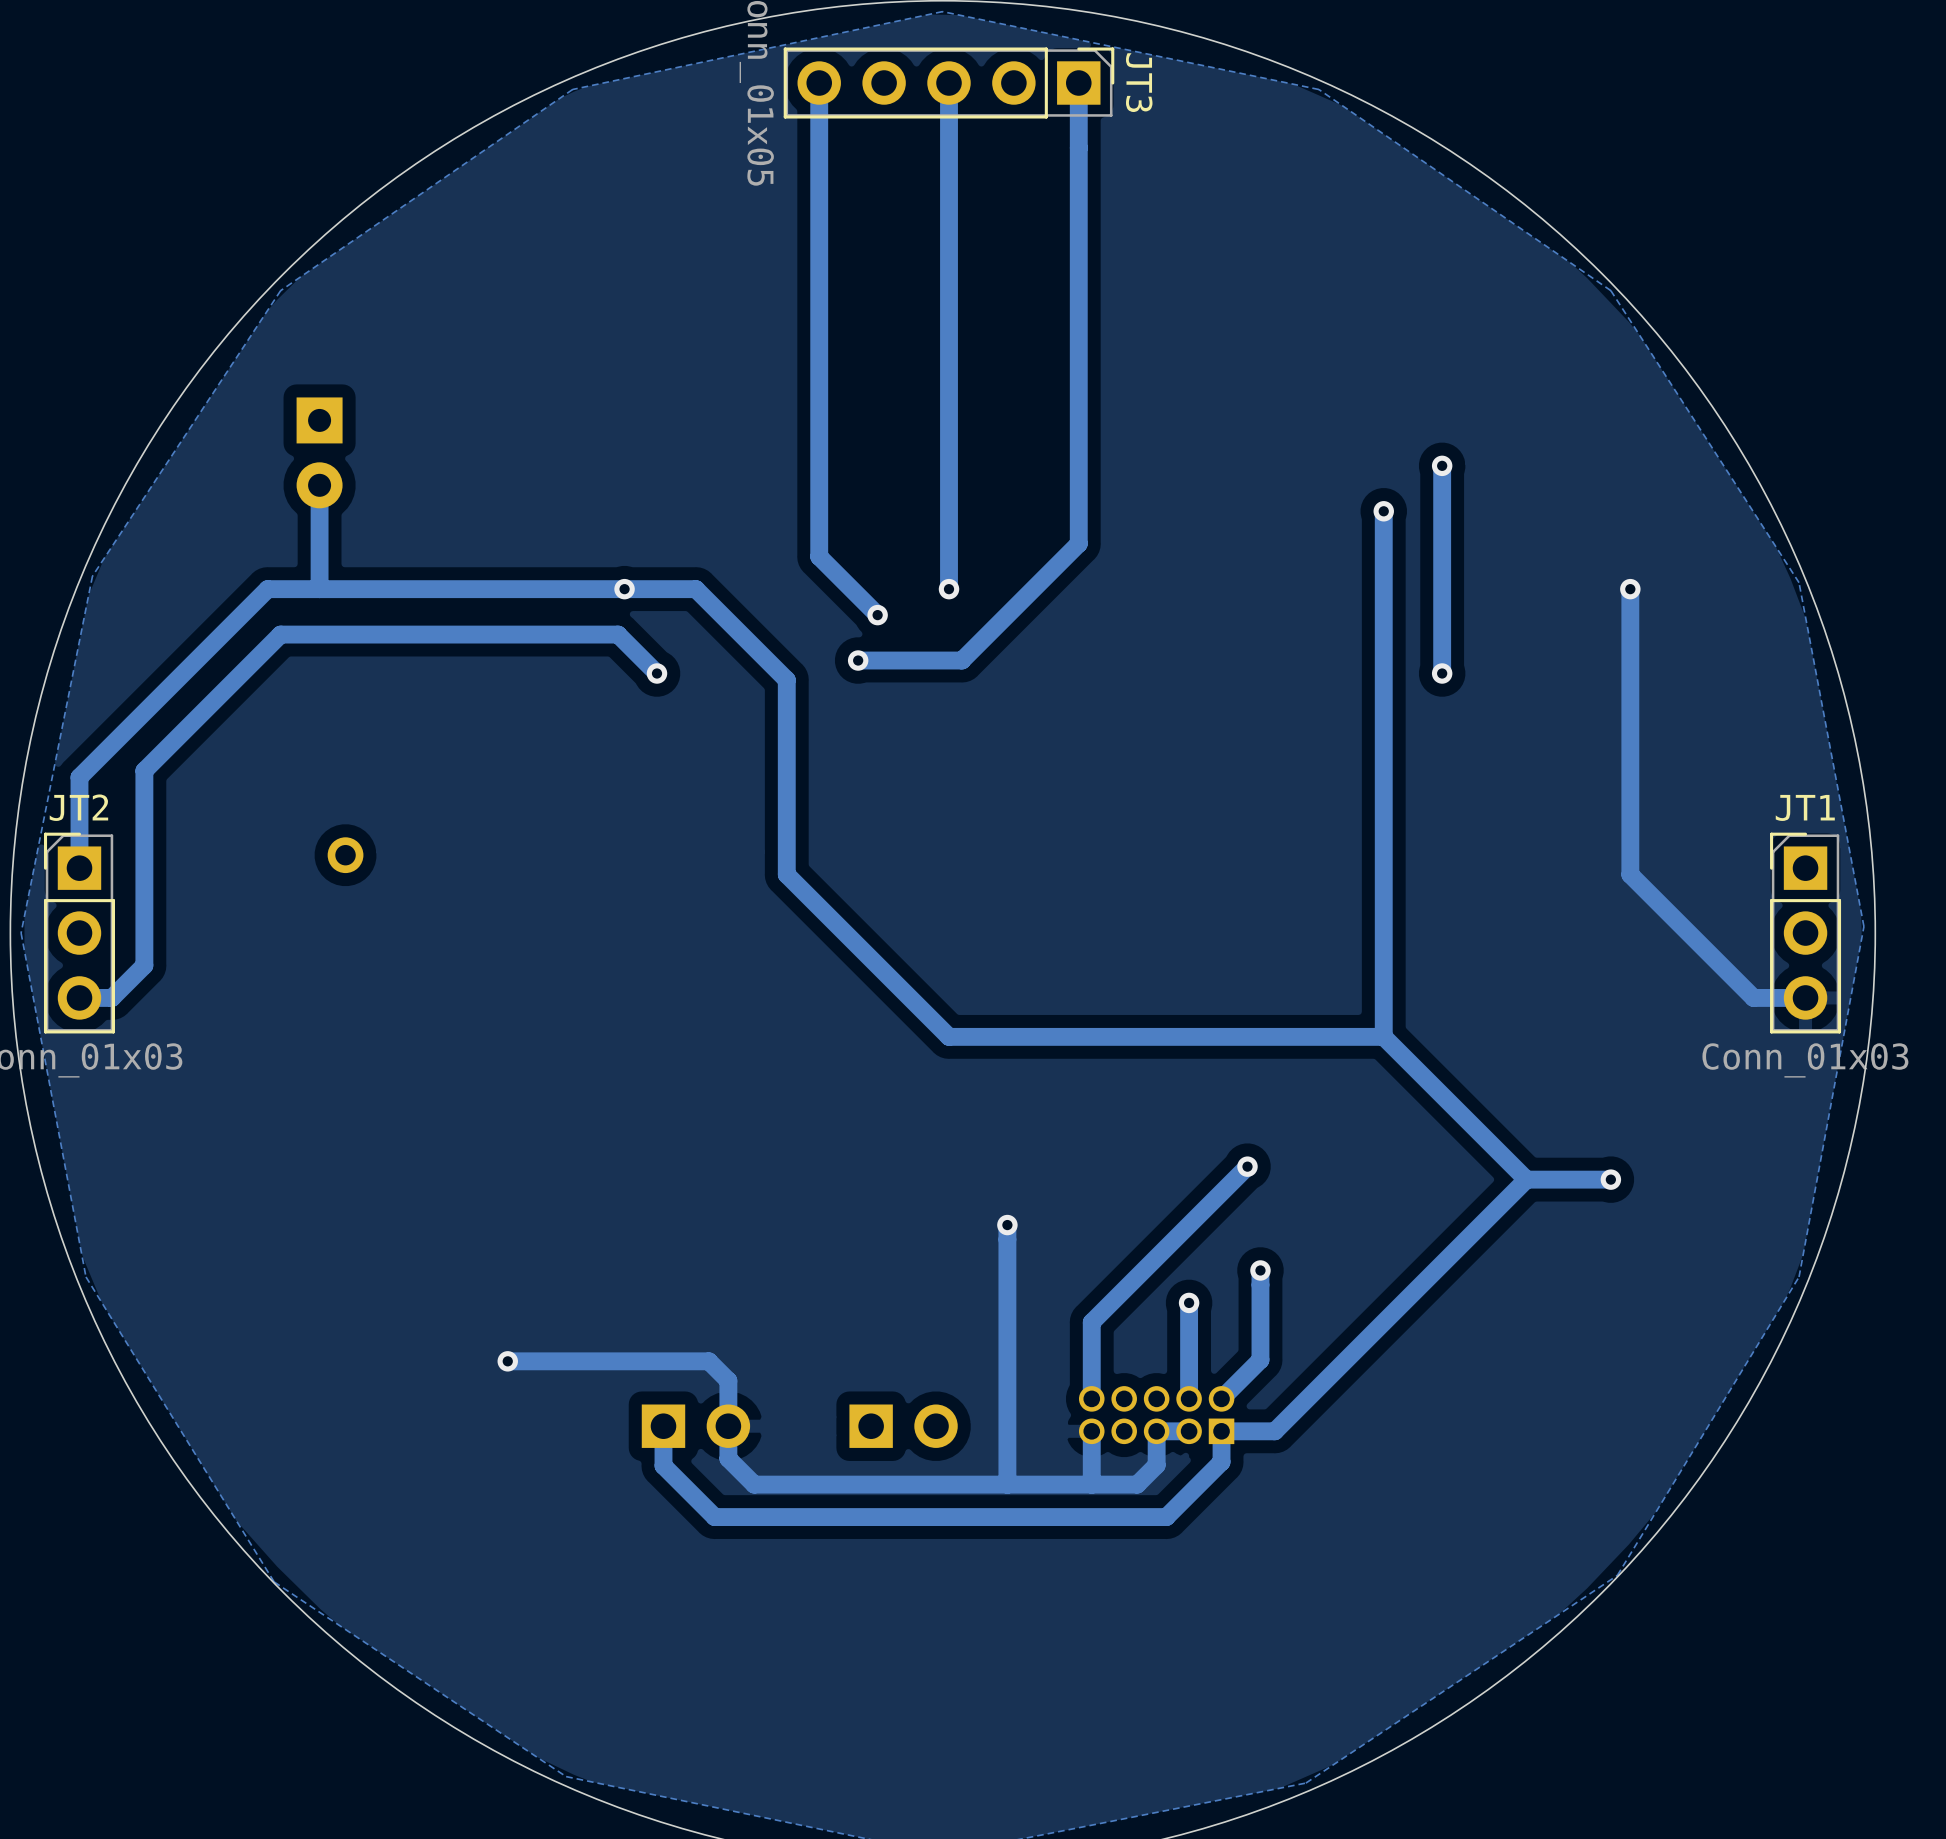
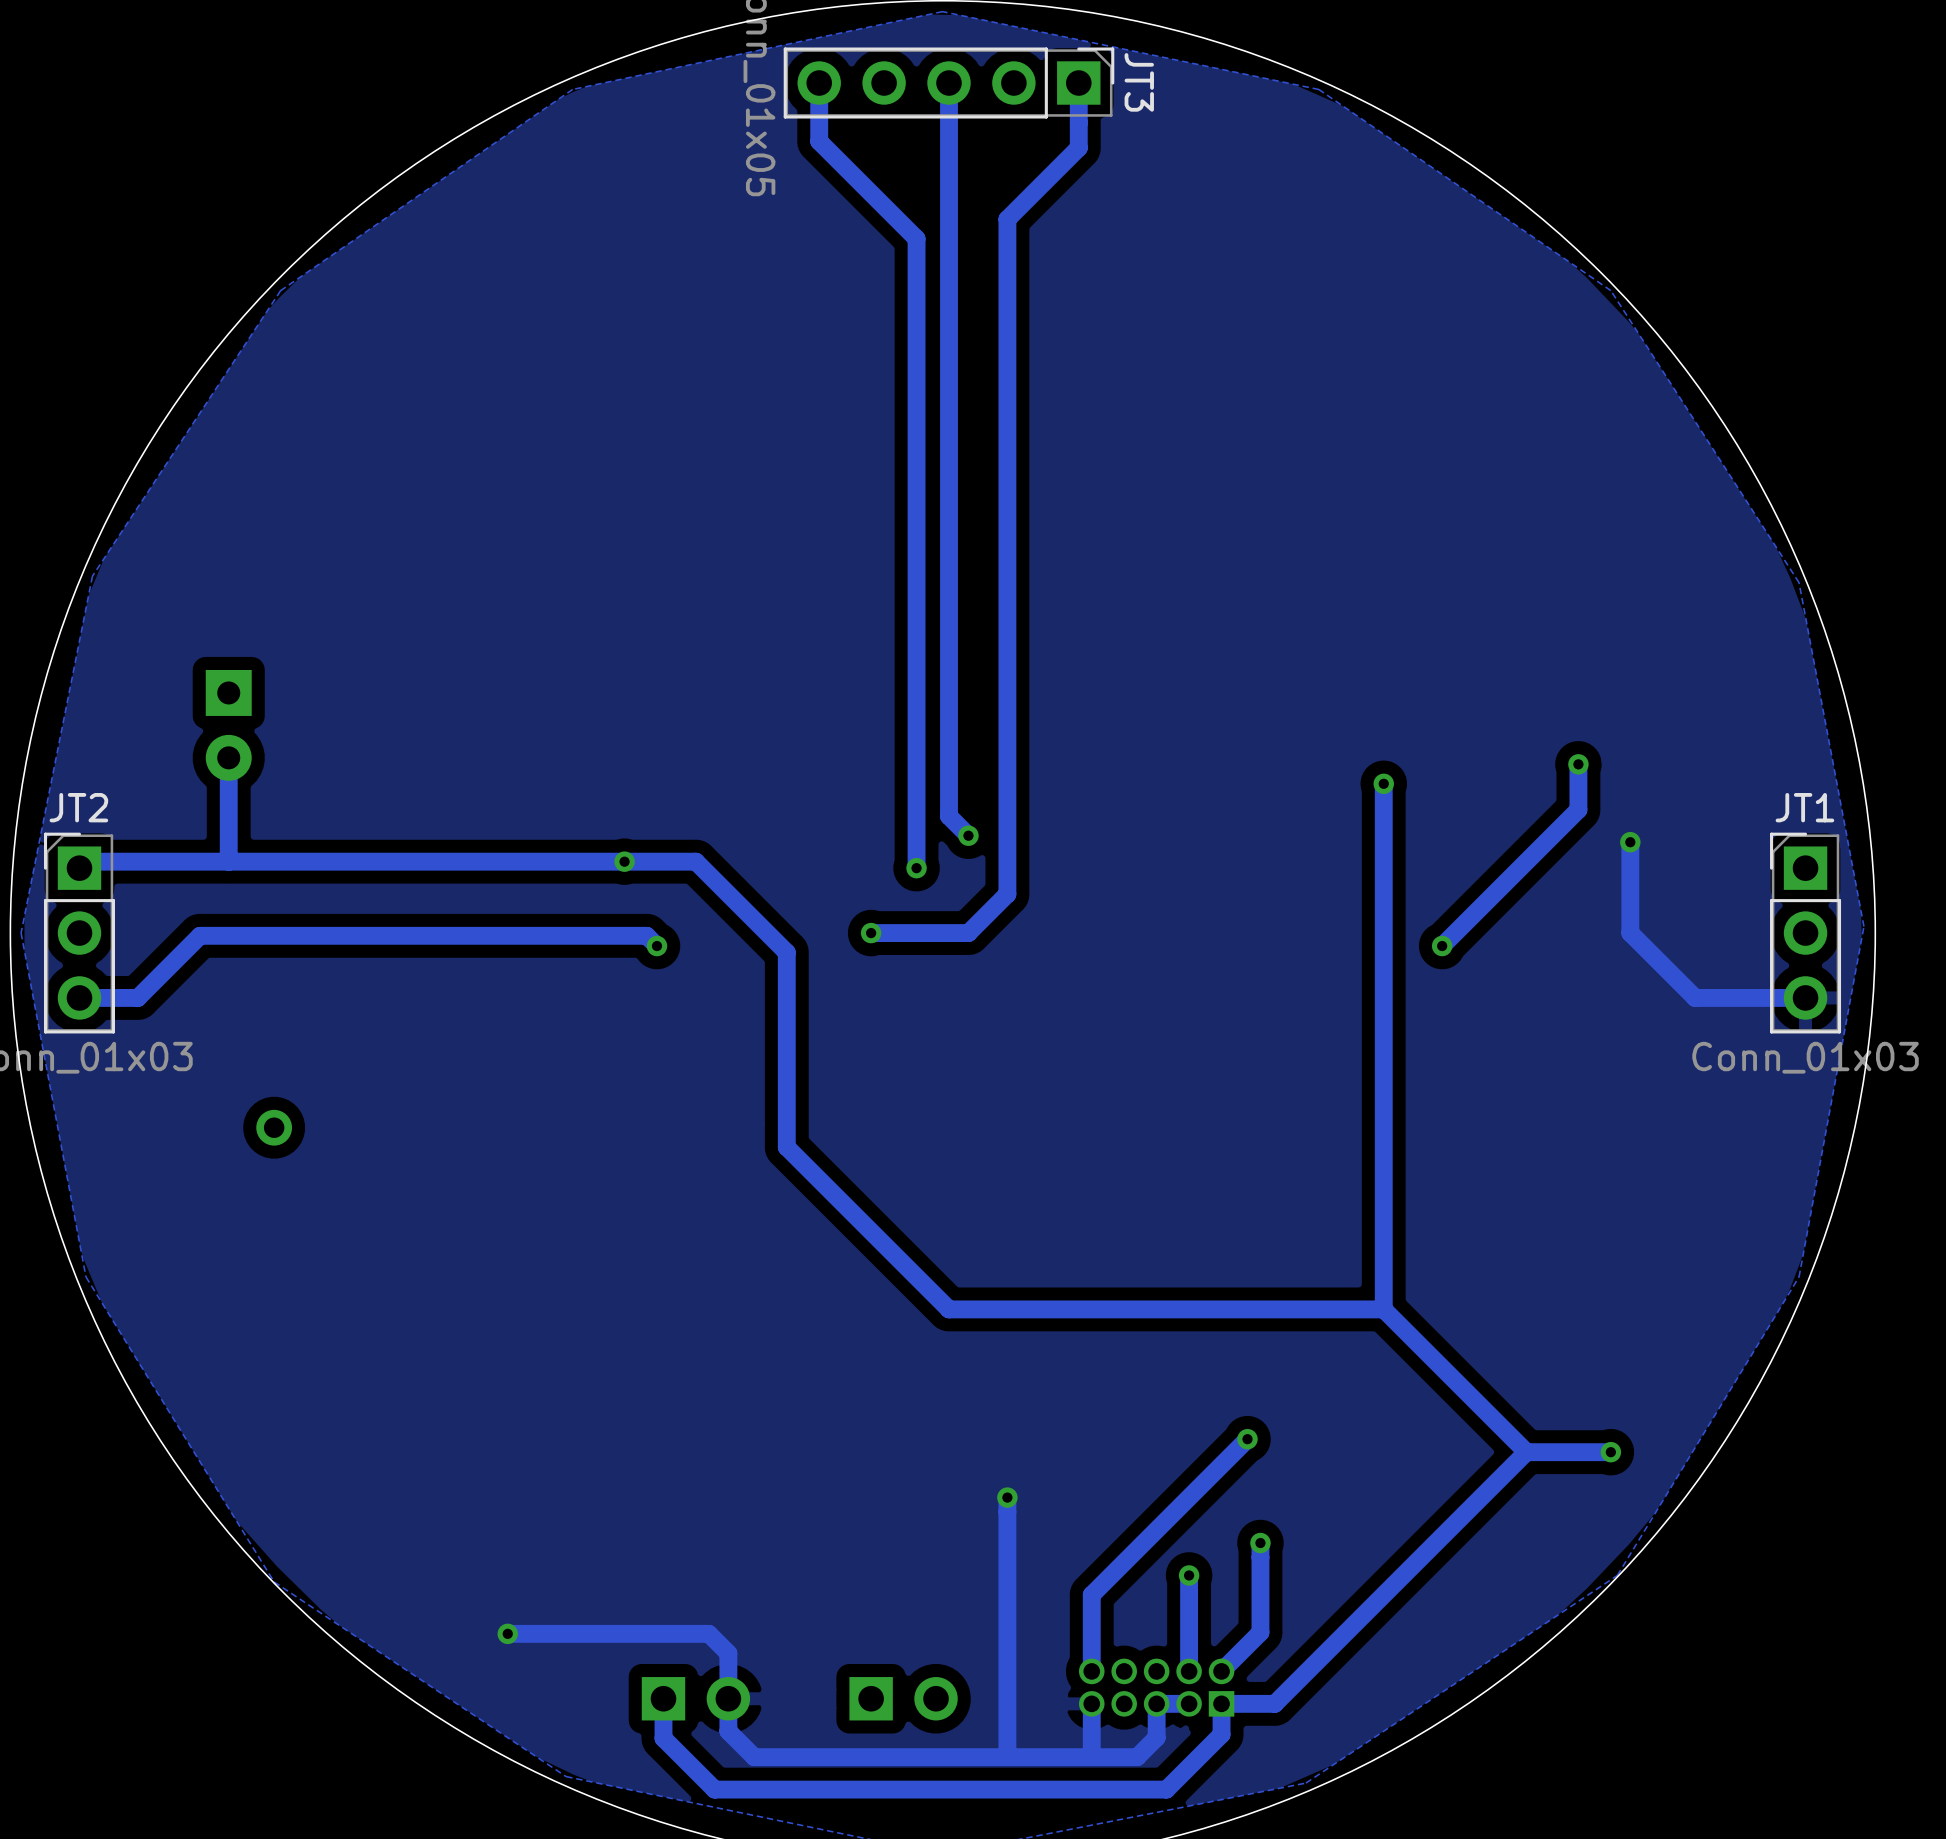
track: (819, 141) (819, 556) (877, 615) -> (819, 141) (916, 238) (916, 868)
track: (1078, 147) (1078, 543) (961, 660) (858, 660) -> (1078, 147) (1007, 219) (1007, 894) (968, 933) (871, 933)
part position: (319, 452) -> (228, 725)
track: (1442, 465) (1442, 673) -> none
via: (1442, 465) -> none
track: (319, 485) (319, 589) -> (228, 757) (228, 861)
track: (1383, 511) (1383, 783) -> (1383, 1036) (1383, 1309)
via: (1383, 511) -> none
via: (624, 589) -> none
track: none -> (949, 589) (949, 816) (968, 835)
via: (949, 589) -> none
track: (1630, 589) (1630, 842) -> none
via: (1630, 589) -> none
via: (877, 615) -> none
via: (858, 660) -> none
track: (657, 673) (618, 634) (280, 634) (144, 770) (144, 965) (111, 997) -> (657, 946) (646, 935) (200, 935) (137, 997) (111, 997)
via: (657, 673) -> none
via: (1442, 673) -> none
track: none -> (1578, 764) (1578, 809) (1442, 946)
via: none -> (1578, 764)
via: none -> (1383, 783)
via: none -> (968, 835)
via: none -> (1630, 842)
part position: (345, 855) -> (274, 1127)
track: none -> (85, 861) (695, 861) (786, 952) (786, 1147) (949, 1309) (1383, 1309)
via: none -> (624, 861)
track: (79, 868) (79, 777) (267, 589) (695, 589) (786, 679) (786, 874) (949, 1036) (1383, 1036) (1526, 1179) -> none
via: none -> (916, 868)
track: (1630, 874) (1753, 997) -> (1630, 874) (1630, 933) (1695, 997) (1753, 997)
via: none -> (871, 933)
via: none -> (657, 946)
via: none -> (1442, 946)
track: (1247, 1166) (1091, 1322) (1091, 1398) -> (1247, 1439) (1091, 1594) (1091, 1671)
via: (1247, 1166) -> none
track: (1526, 1179) (1274, 1431) (1221, 1431) (1221, 1461) (1166, 1517) (714, 1517) (663, 1465) (663, 1426) -> (1526, 1452) (1274, 1703) (1221, 1703) (1221, 1734) (1166, 1789) (714, 1789) (663, 1738) (663, 1698)
track: (1610, 1179) (1526, 1179) -> (1610, 1452) (1526, 1452)
via: (1610, 1179) -> none
track: (1007, 1225) (1007, 1484) -> (1007, 1497) (1007, 1757)
via: (1007, 1225) -> none
track: (1260, 1270) (1260, 1359) (1221, 1398) -> (1260, 1543) (1260, 1632) (1221, 1671)
via: (1260, 1270) -> none
track: (1189, 1302) (1189, 1398) -> (1189, 1575) (1189, 1671)
via: (1189, 1302) -> none
track: none -> (1383, 1309) (1526, 1452)
track: (507, 1361) (708, 1361) (728, 1380) (728, 1458) (754, 1484) (1137, 1484) (1156, 1465) (1156, 1431) (1189, 1431) -> (507, 1633) (708, 1633) (728, 1653) (728, 1731) (754, 1757) (1137, 1757) (1156, 1737) (1156, 1703) (1189, 1703)
via: (507, 1361) -> none
part position: (1156, 1415) -> (1156, 1687)
part: (695, 1426) -> none
part: (903, 1426) -> none
track: (1091, 1431) (1091, 1484) -> (1091, 1703) (1091, 1757)
via: none -> (1247, 1439)
via: none -> (1610, 1452)
via: none -> (1007, 1497)
via: none -> (1260, 1543)
via: none -> (1189, 1575)
via: none -> (507, 1633)
part: none -> (695, 1698)
part: none -> (903, 1698)

